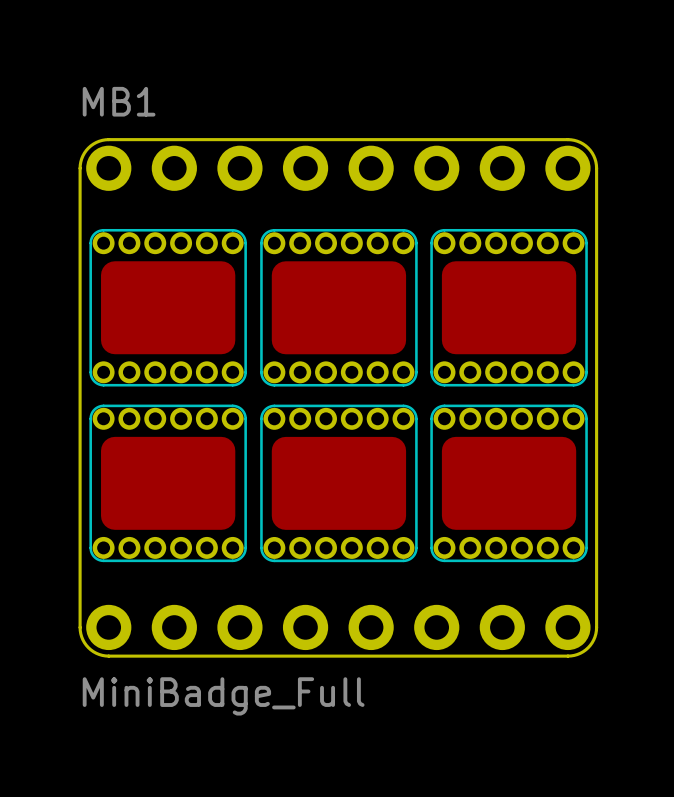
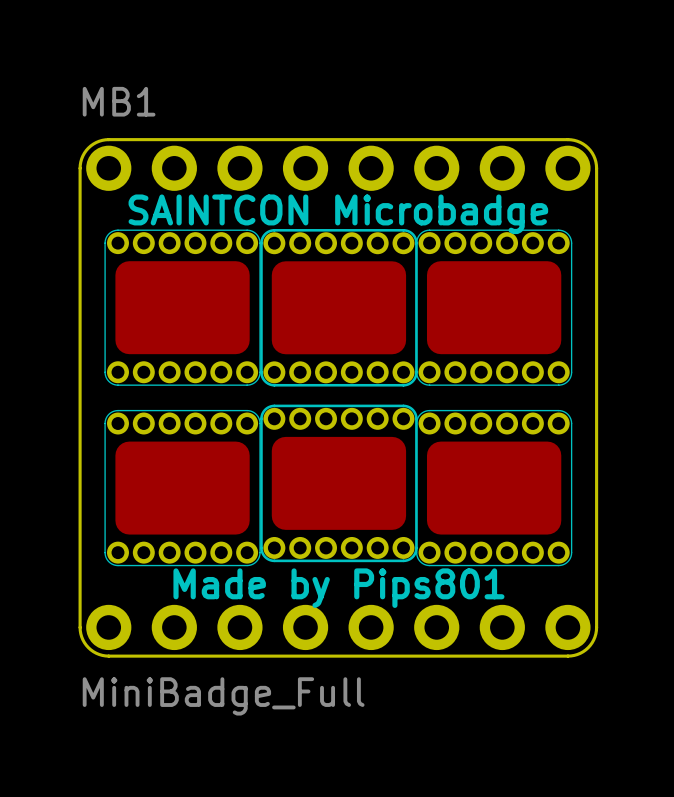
text: none -> SAINTCON Microbadge (338, 214)
part footprint: [89, 228, 247, 387] -> [104, 229, 261, 386]
part footprint: [430, 228, 588, 387] -> [416, 229, 573, 386]
part footprint: [89, 404, 247, 563] -> [104, 409, 261, 567]
part footprint: [430, 404, 588, 563] -> [416, 409, 573, 567]
text: none -> Made by Pips801 (338, 588)

